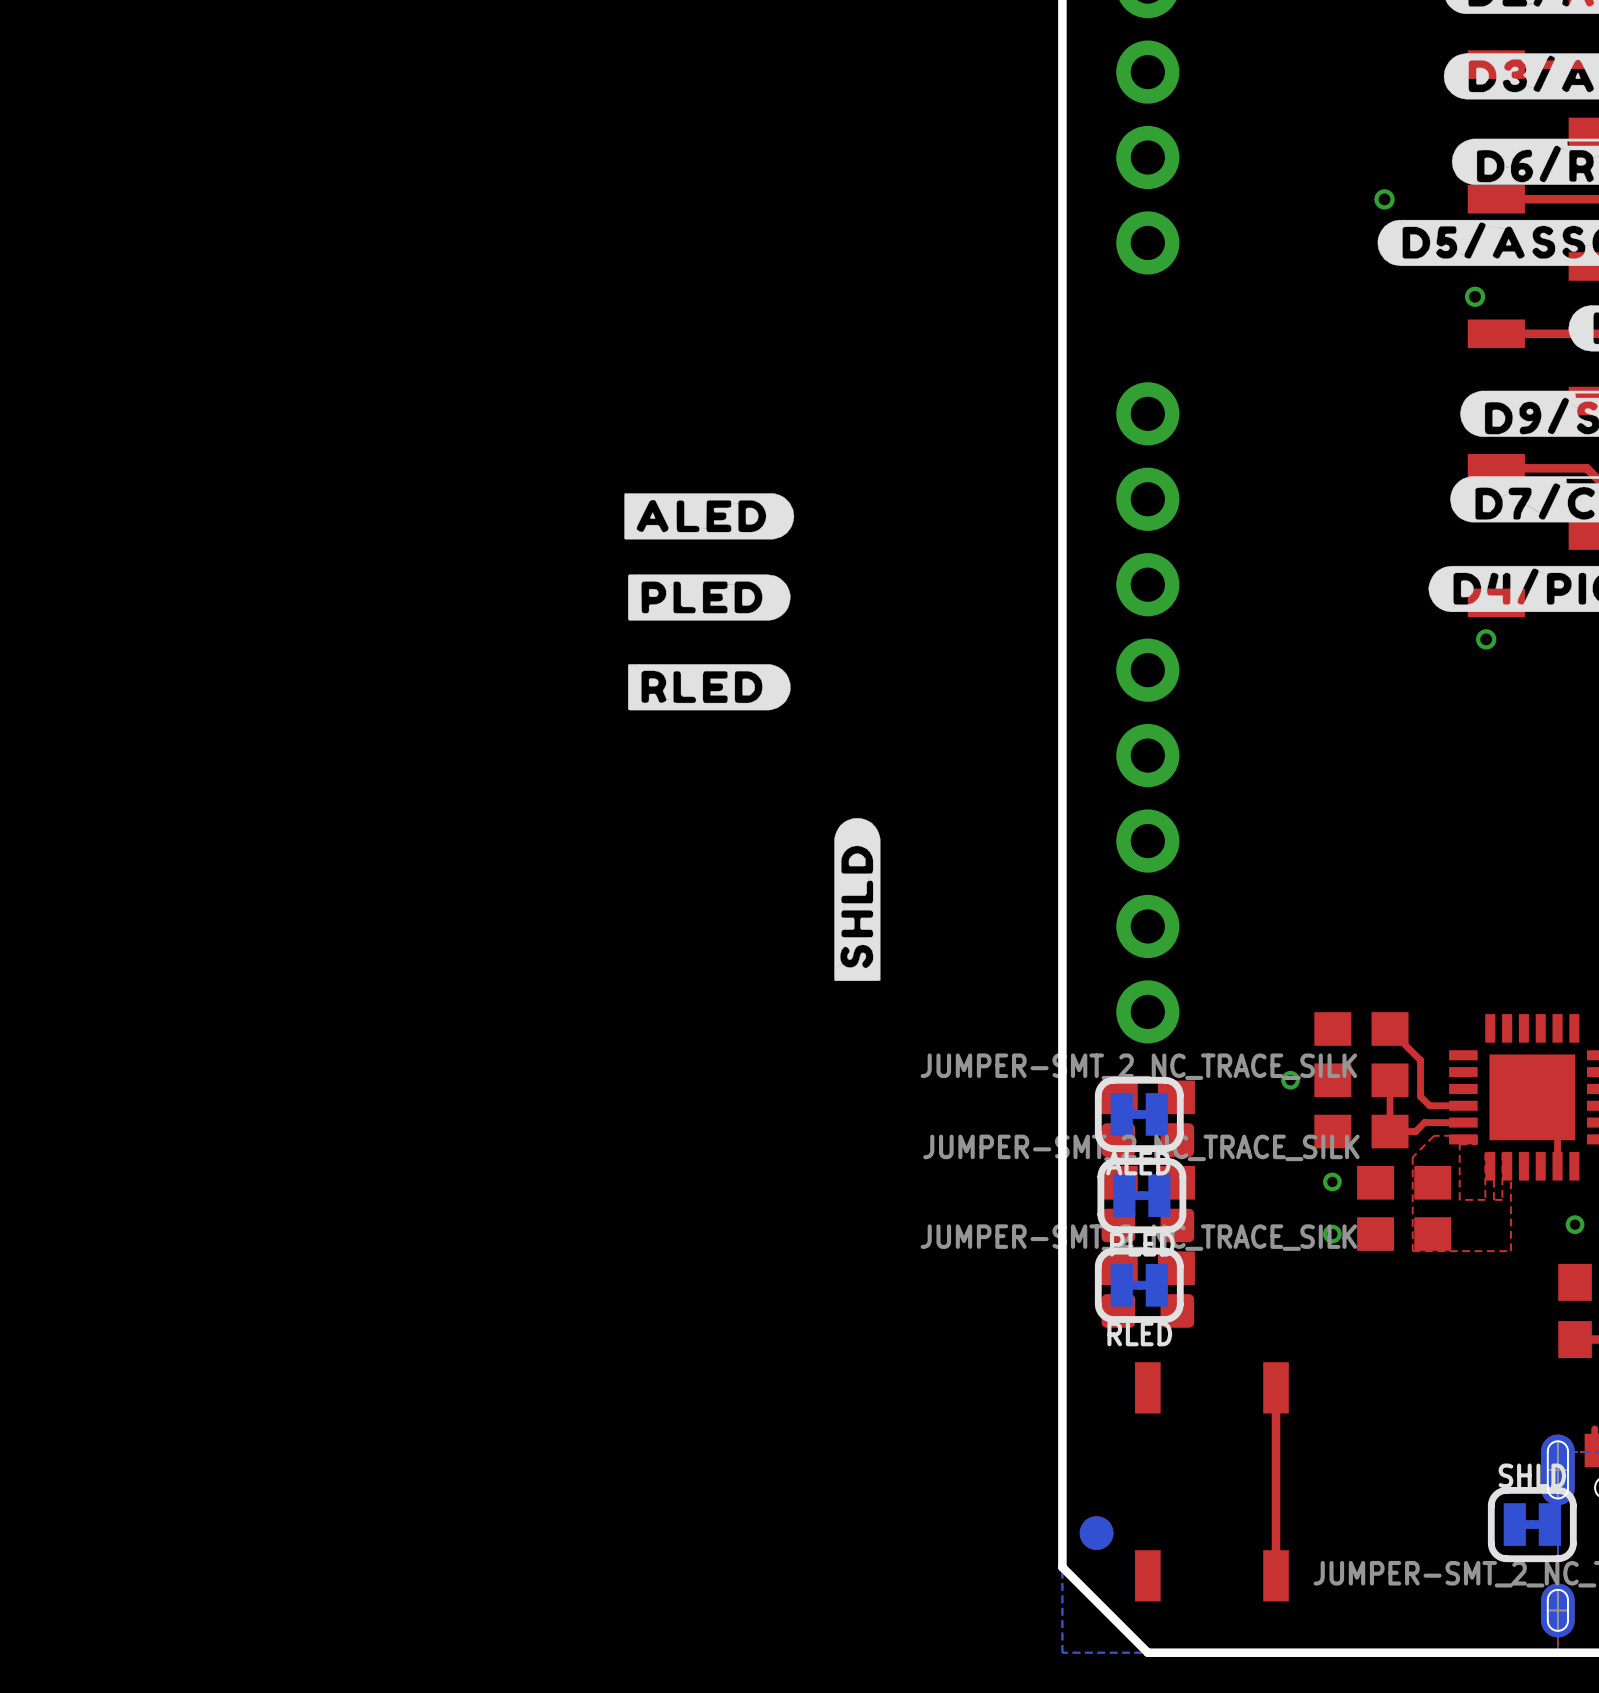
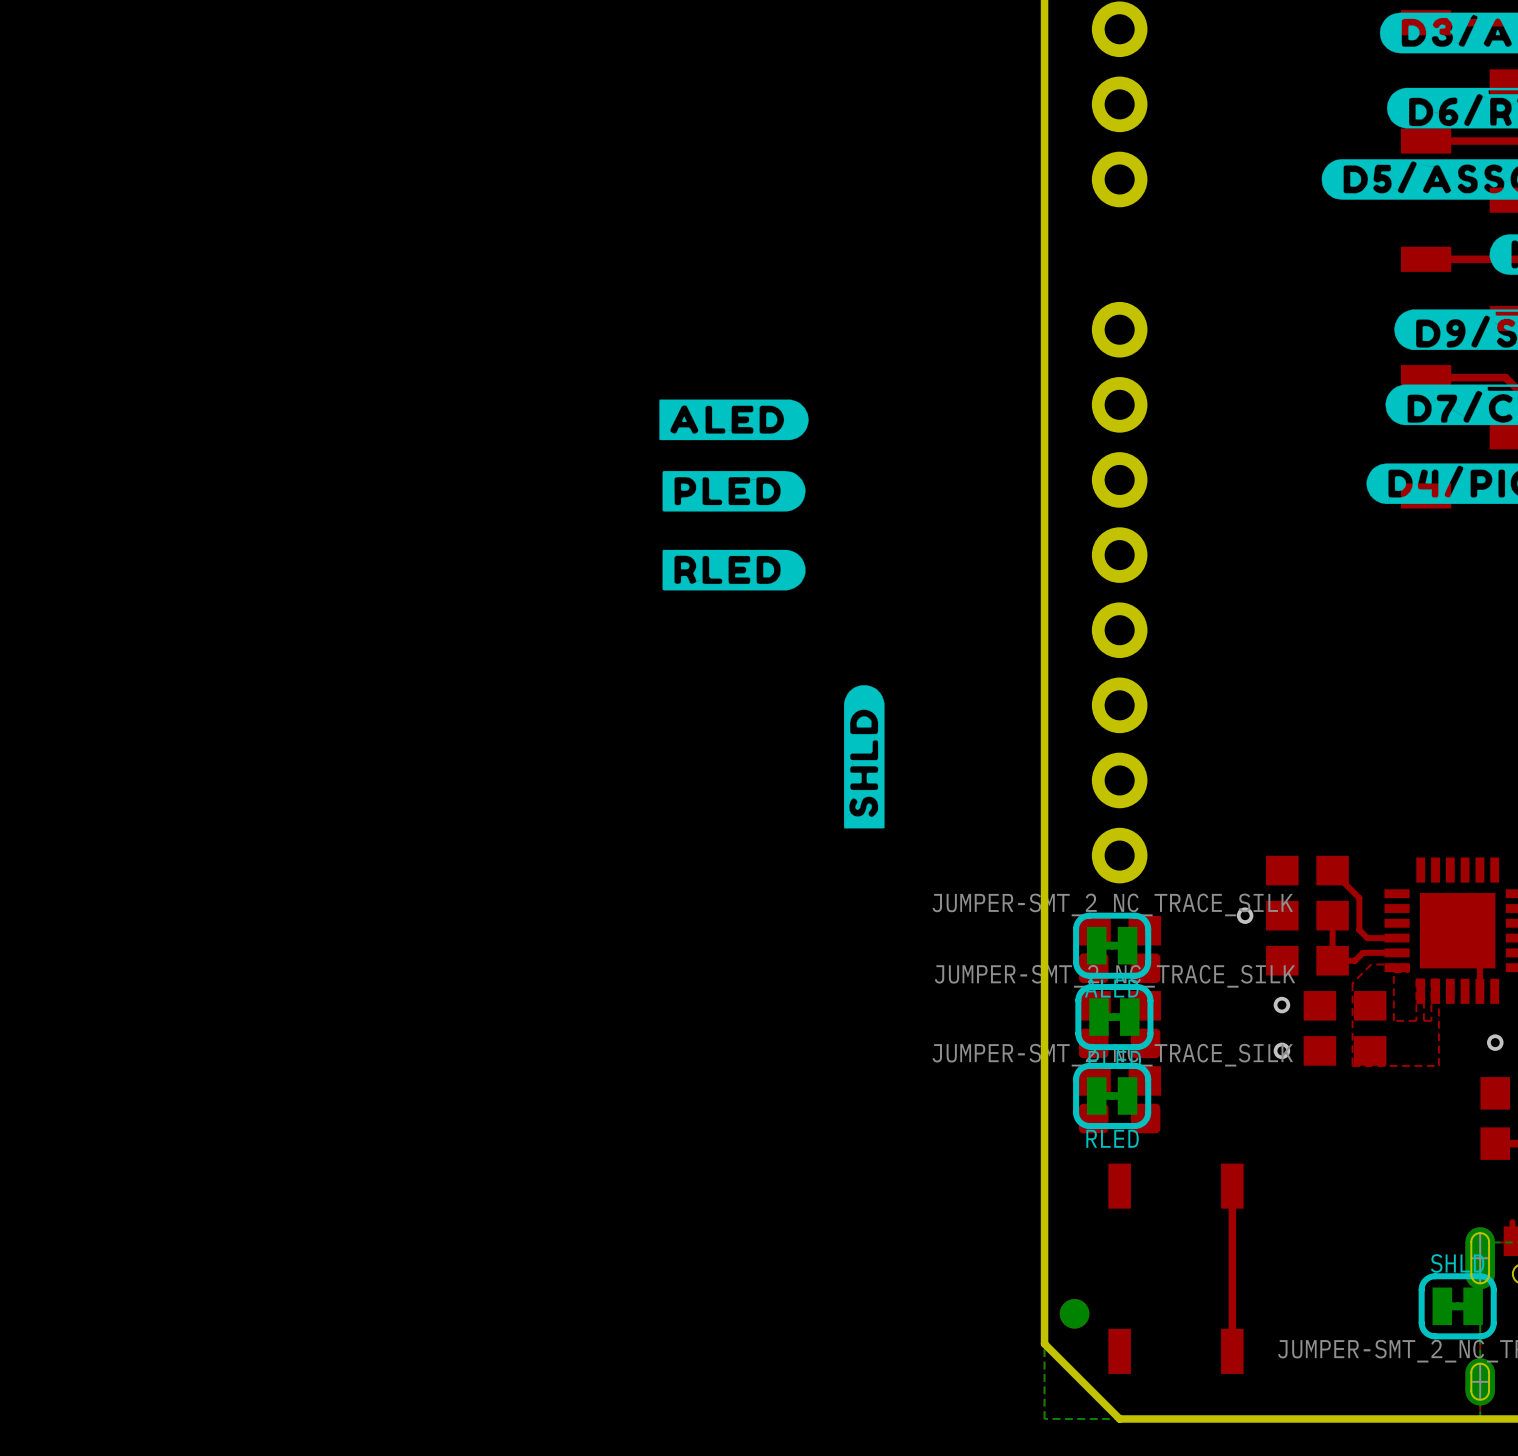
via: (1384, 199) -> none
via: (1475, 296) -> none
via: (1486, 639) -> none

